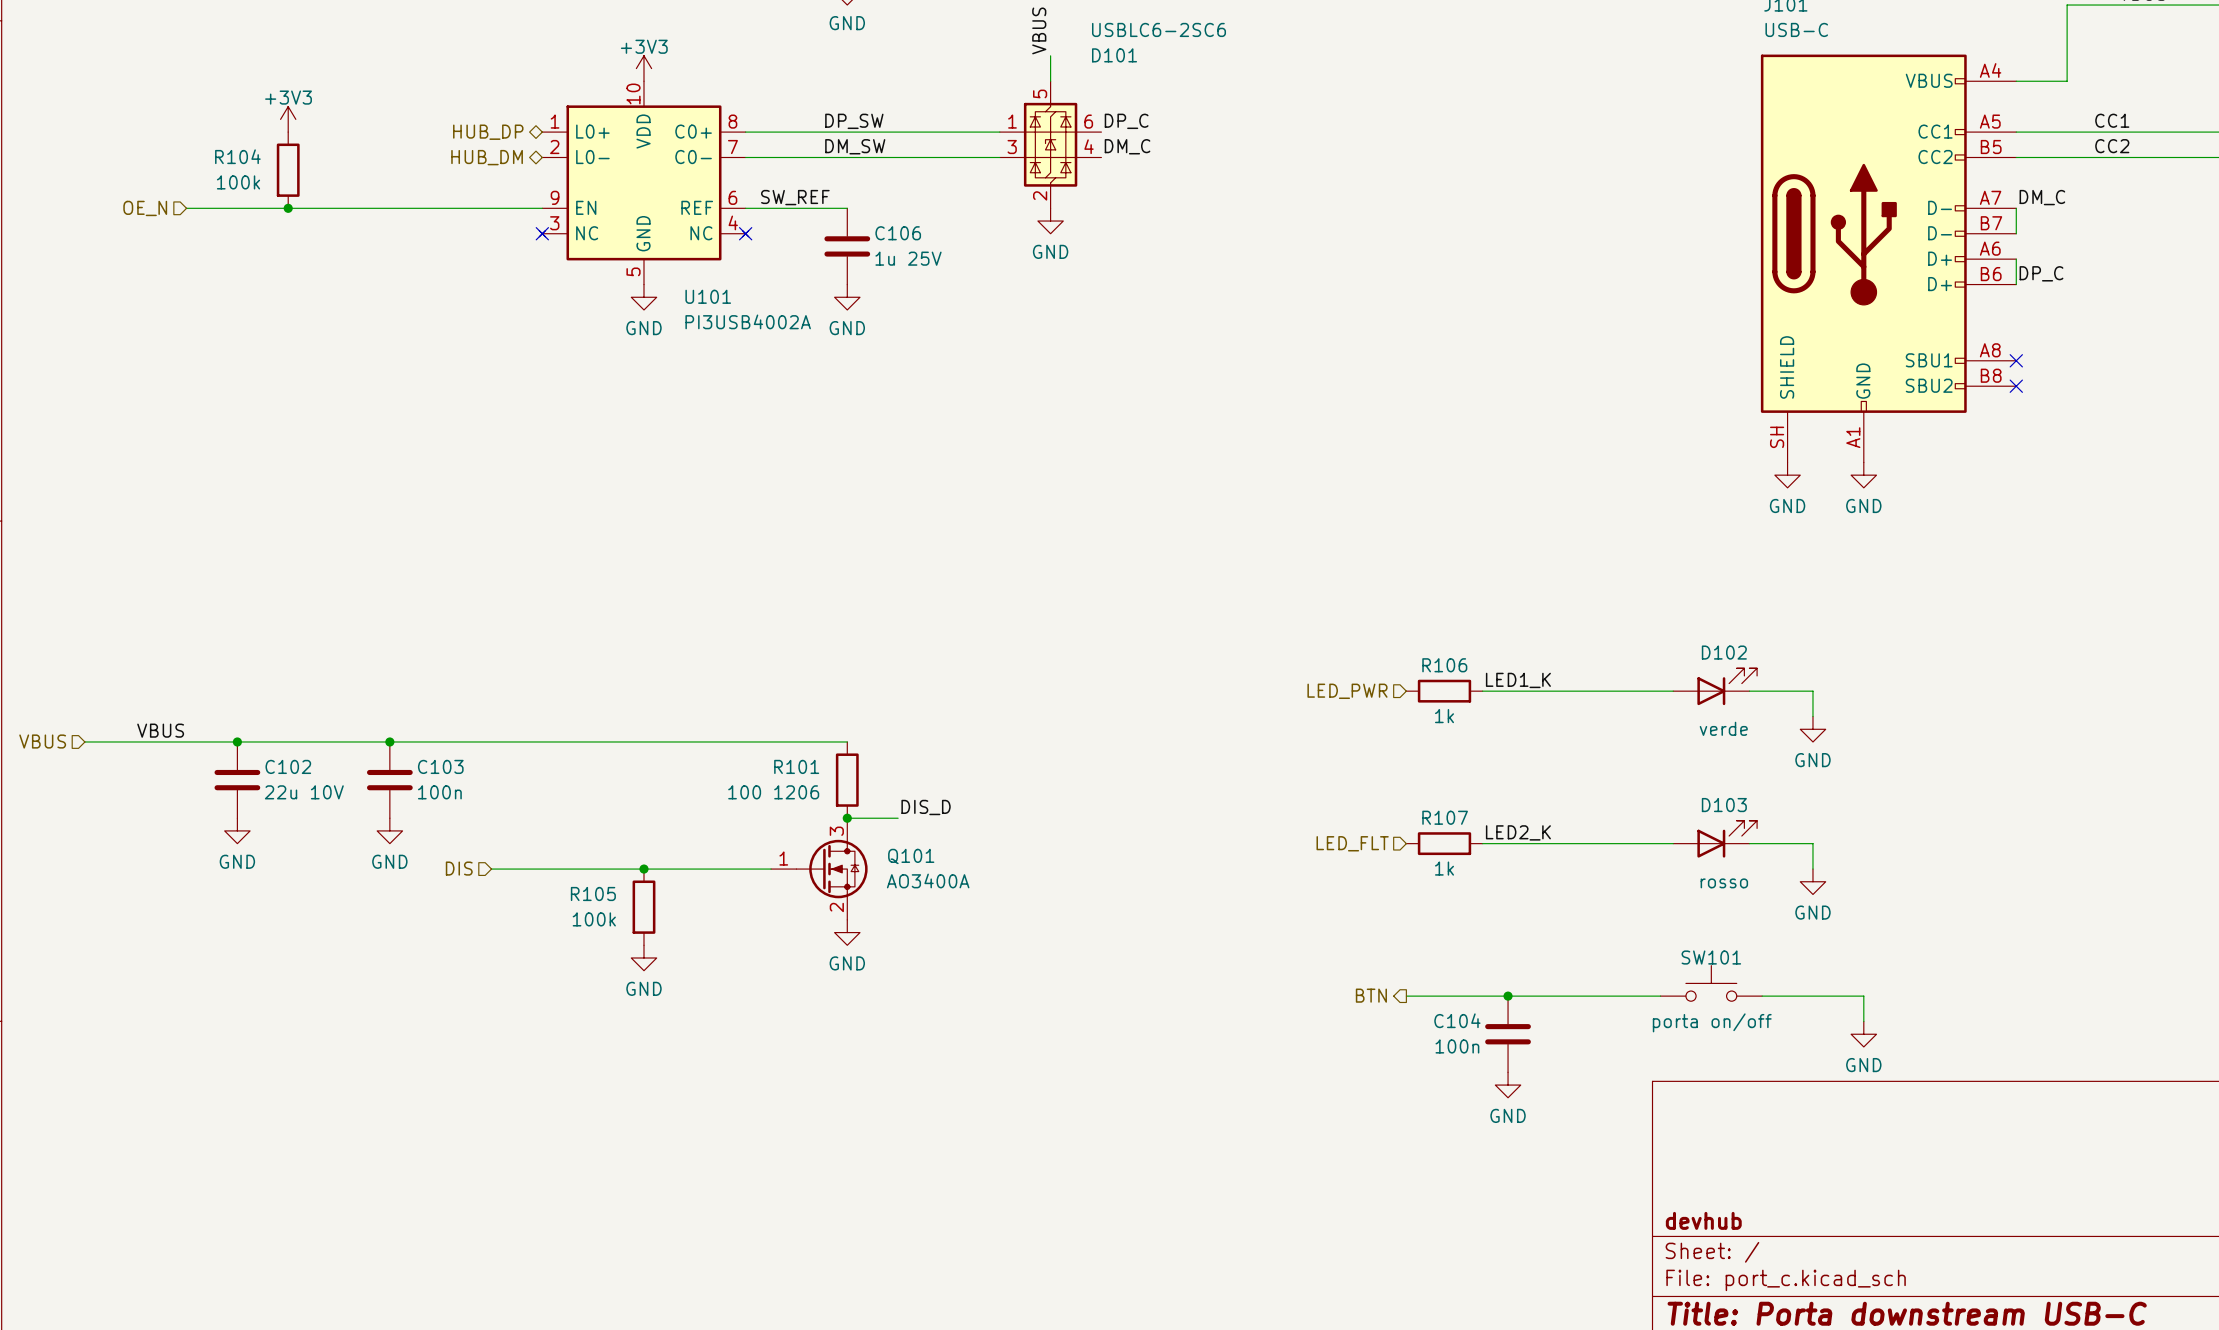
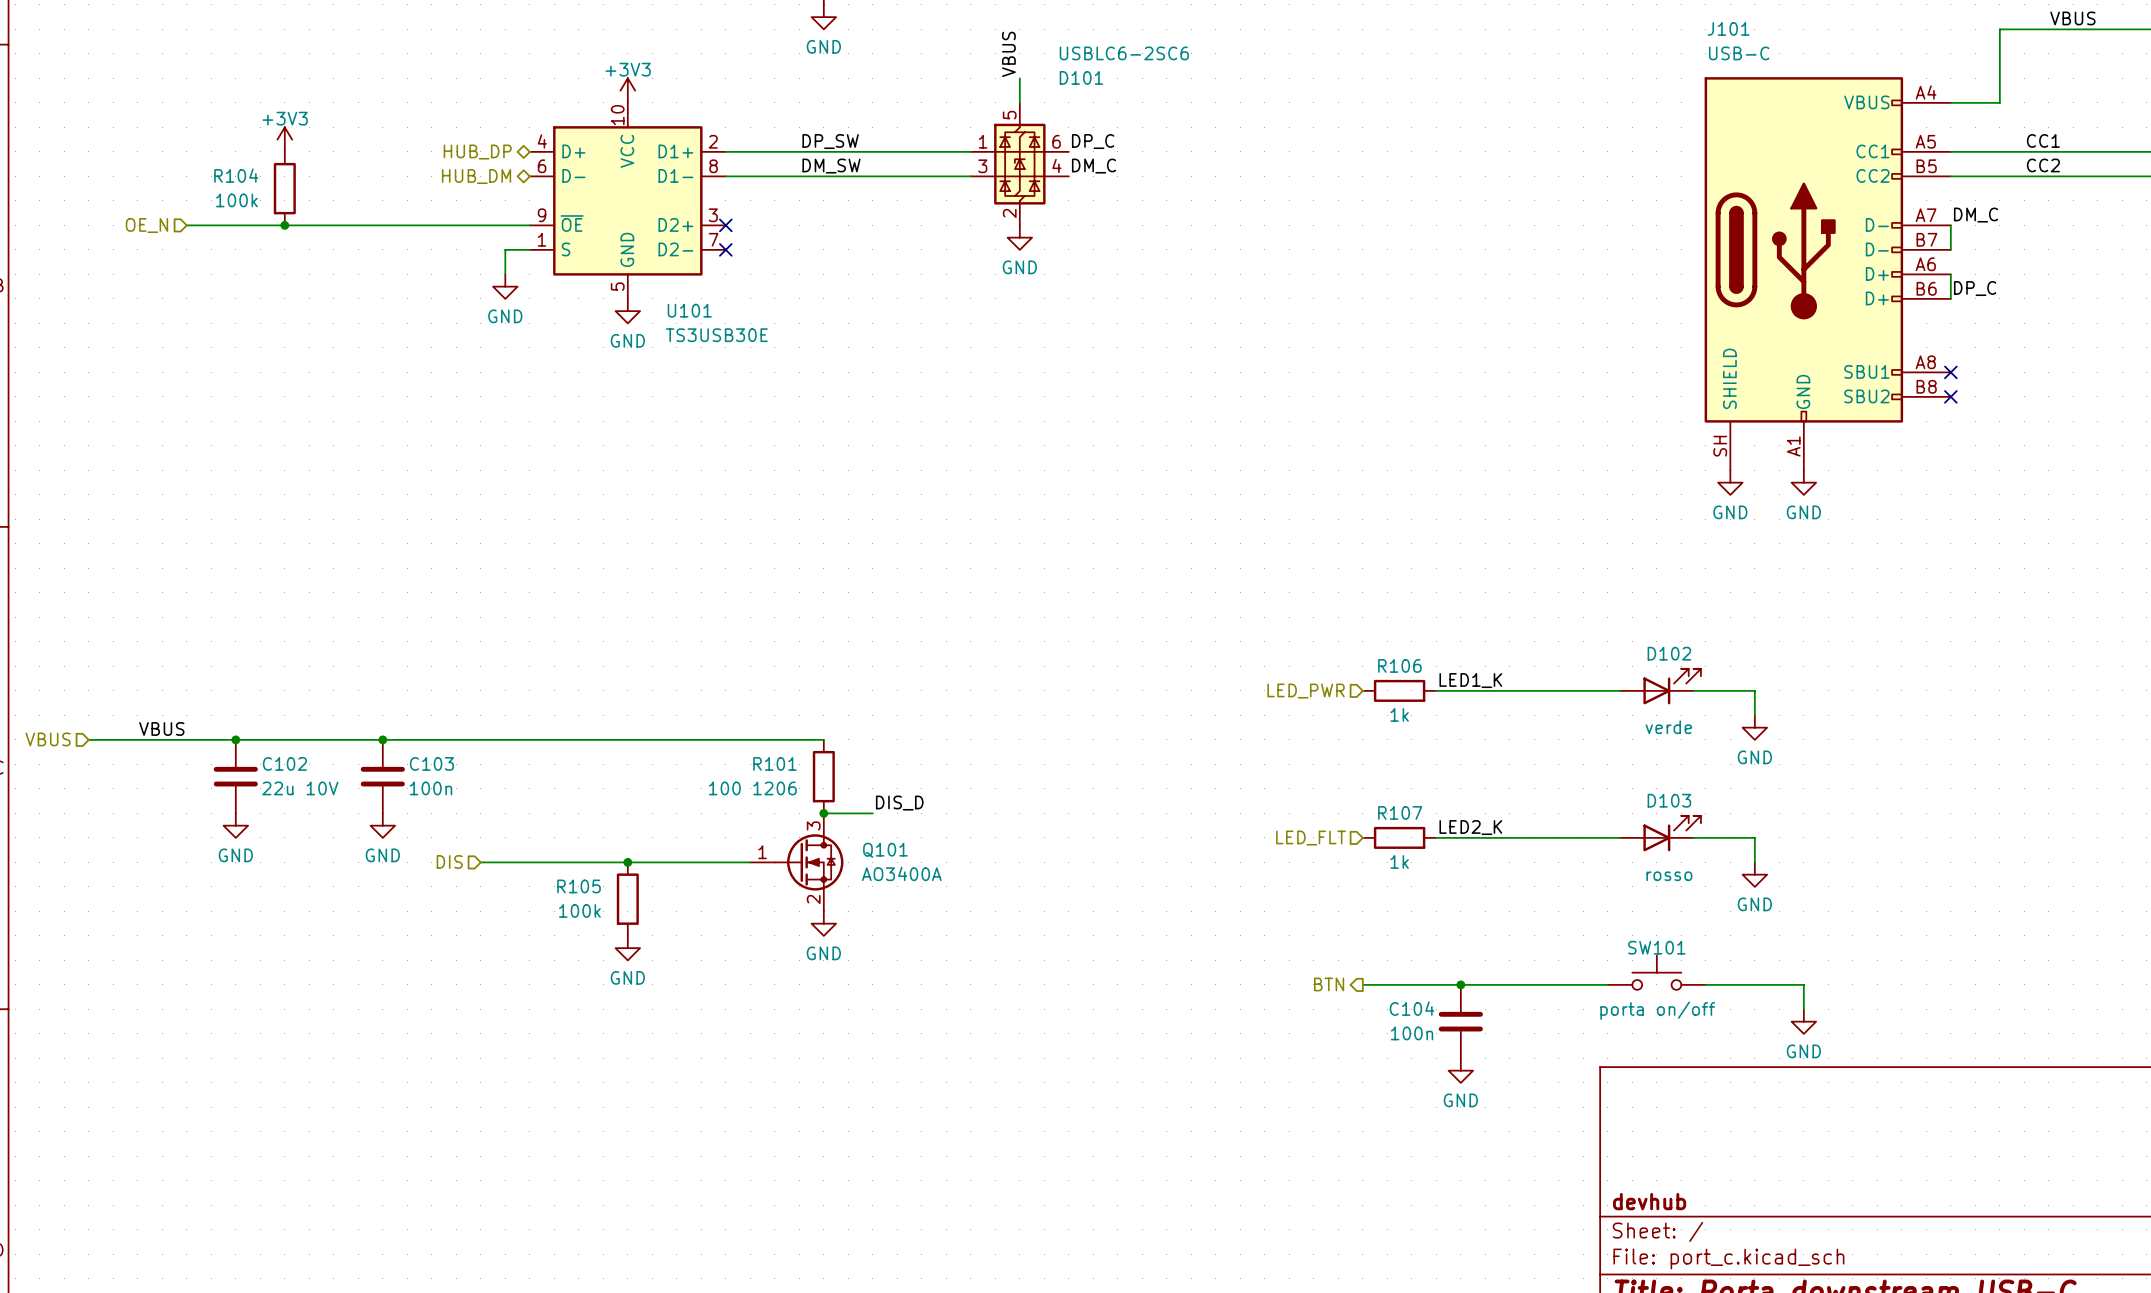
U101 symbol: [539, 81, 749, 285] -> [529, 102, 726, 299]
label: SW_REF (795, 197) -> none
wire: (745, 208) (847, 208) -> none
no-connect mark: none -> (725, 225)
wire: none -> (529, 249) (505, 249) (505, 274)
no-connect mark: (542, 233) -> none
C106: 1u 25V (847, 246) -> none
power symbol: none -> GND (505, 286)
power symbol: GND (847, 297) -> none
U101 value: PI3USB4002A (748, 321) -> TS3USB30E (716, 335)

